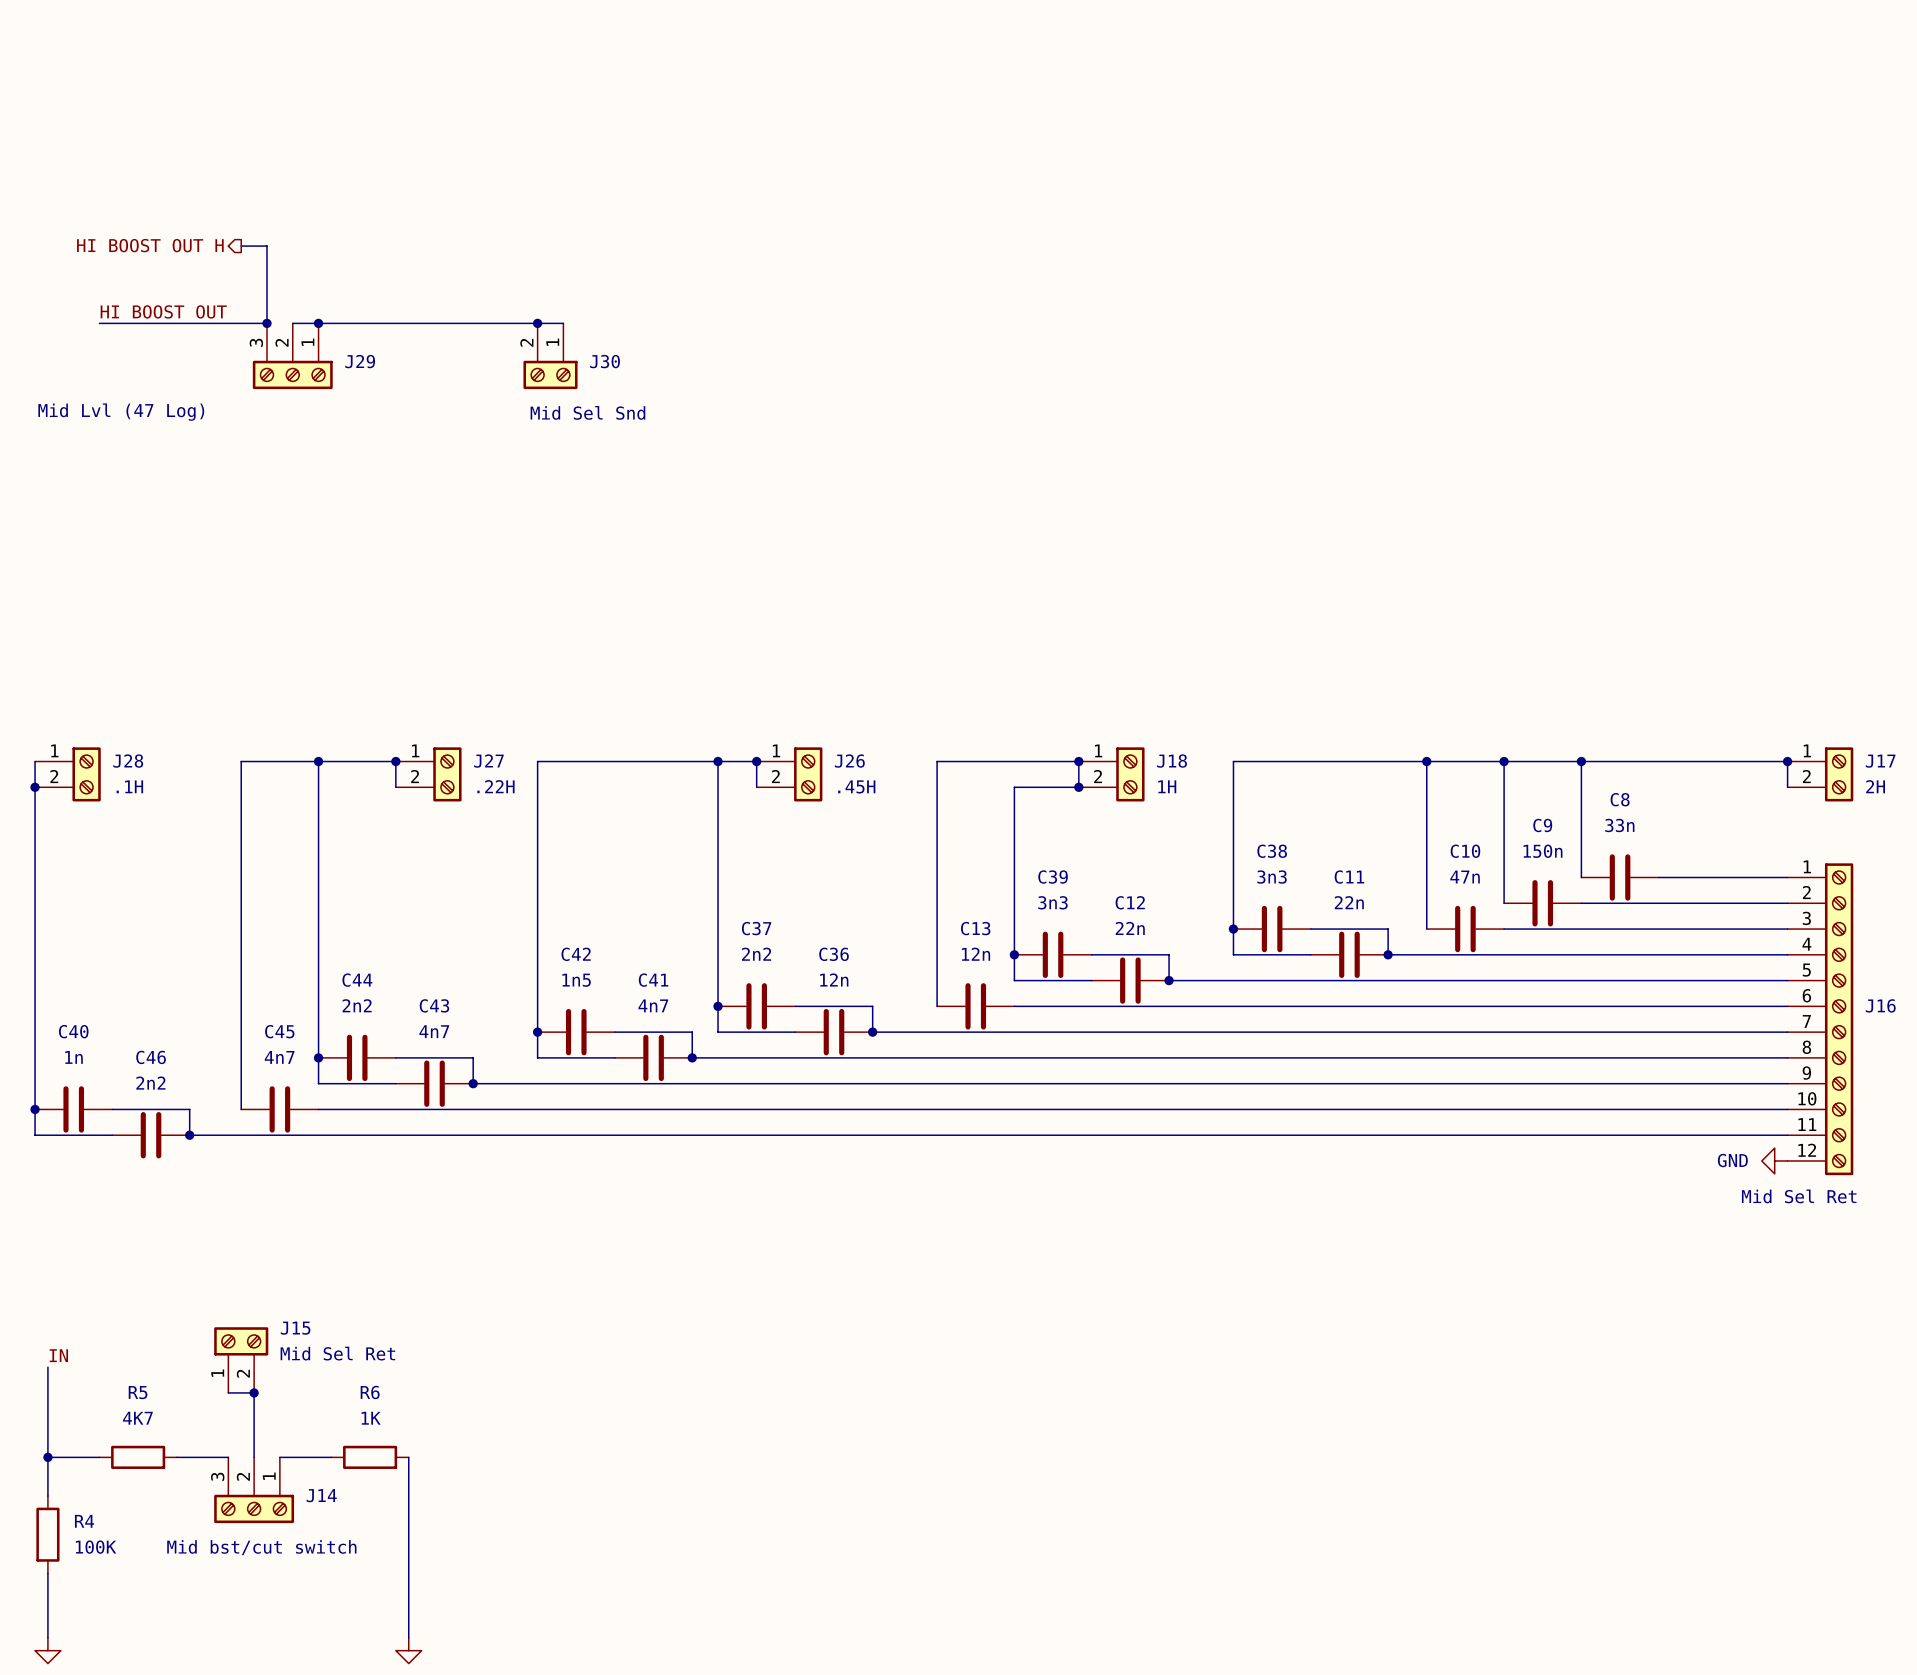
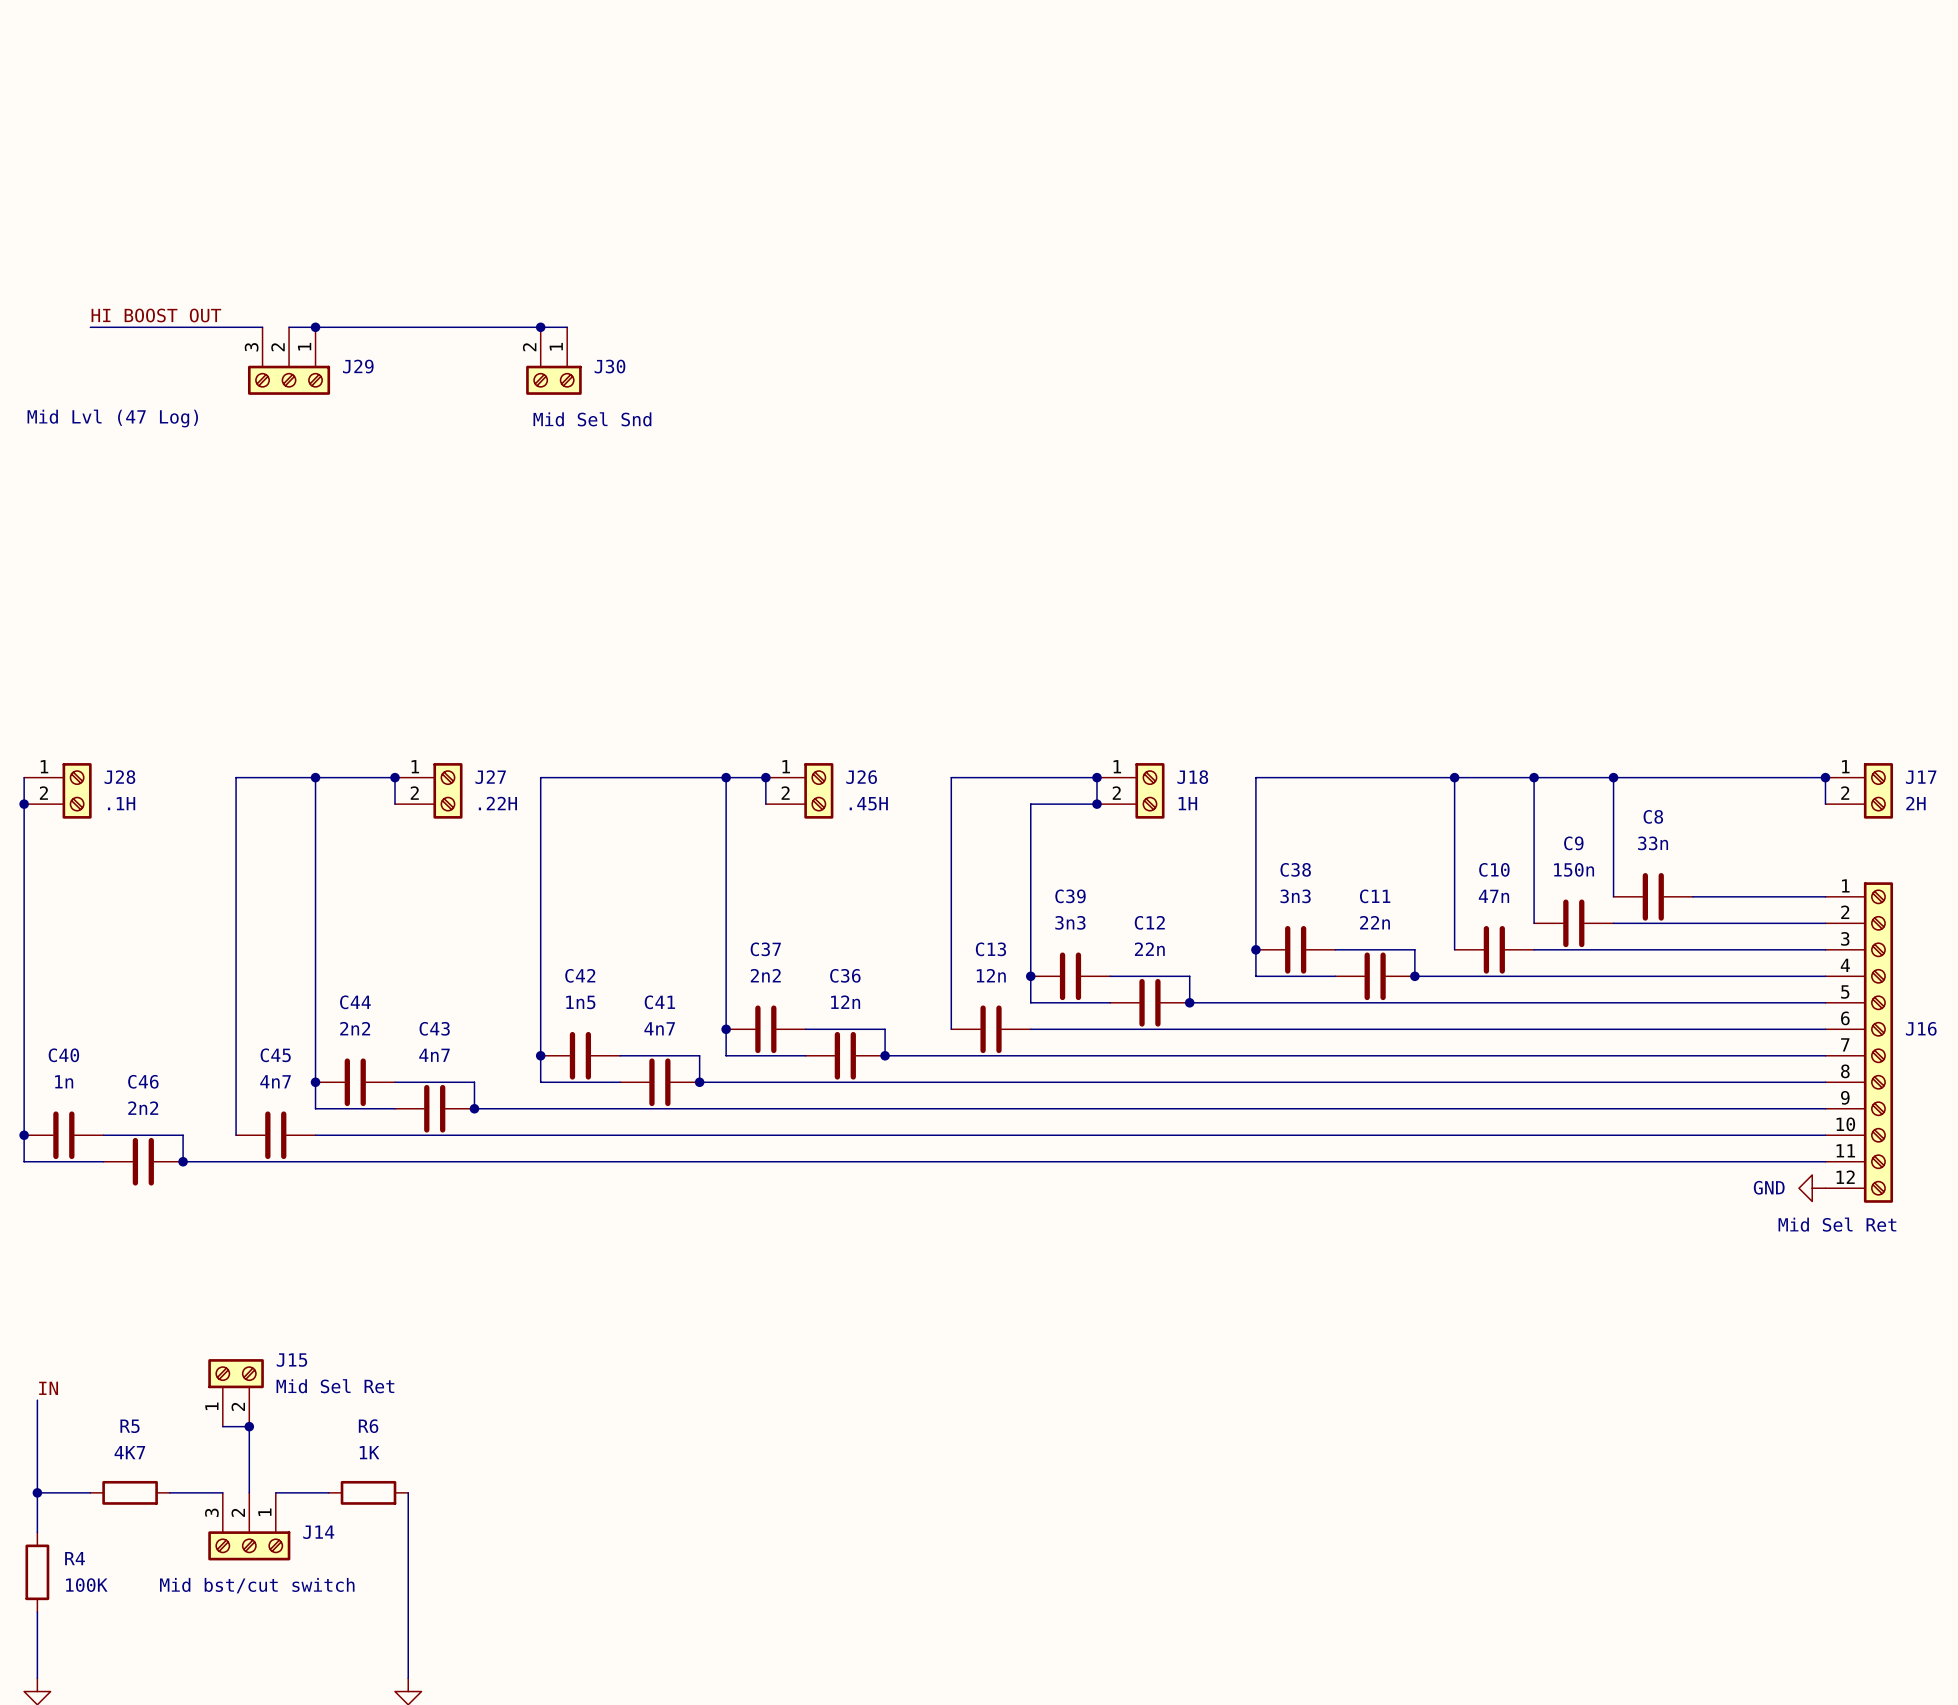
hierarchical label: HI BOOST OUT H (150, 245) -> none
wire: (241, 246) (267, 246) (267, 323) -> none
junction: (267, 323) -> none

